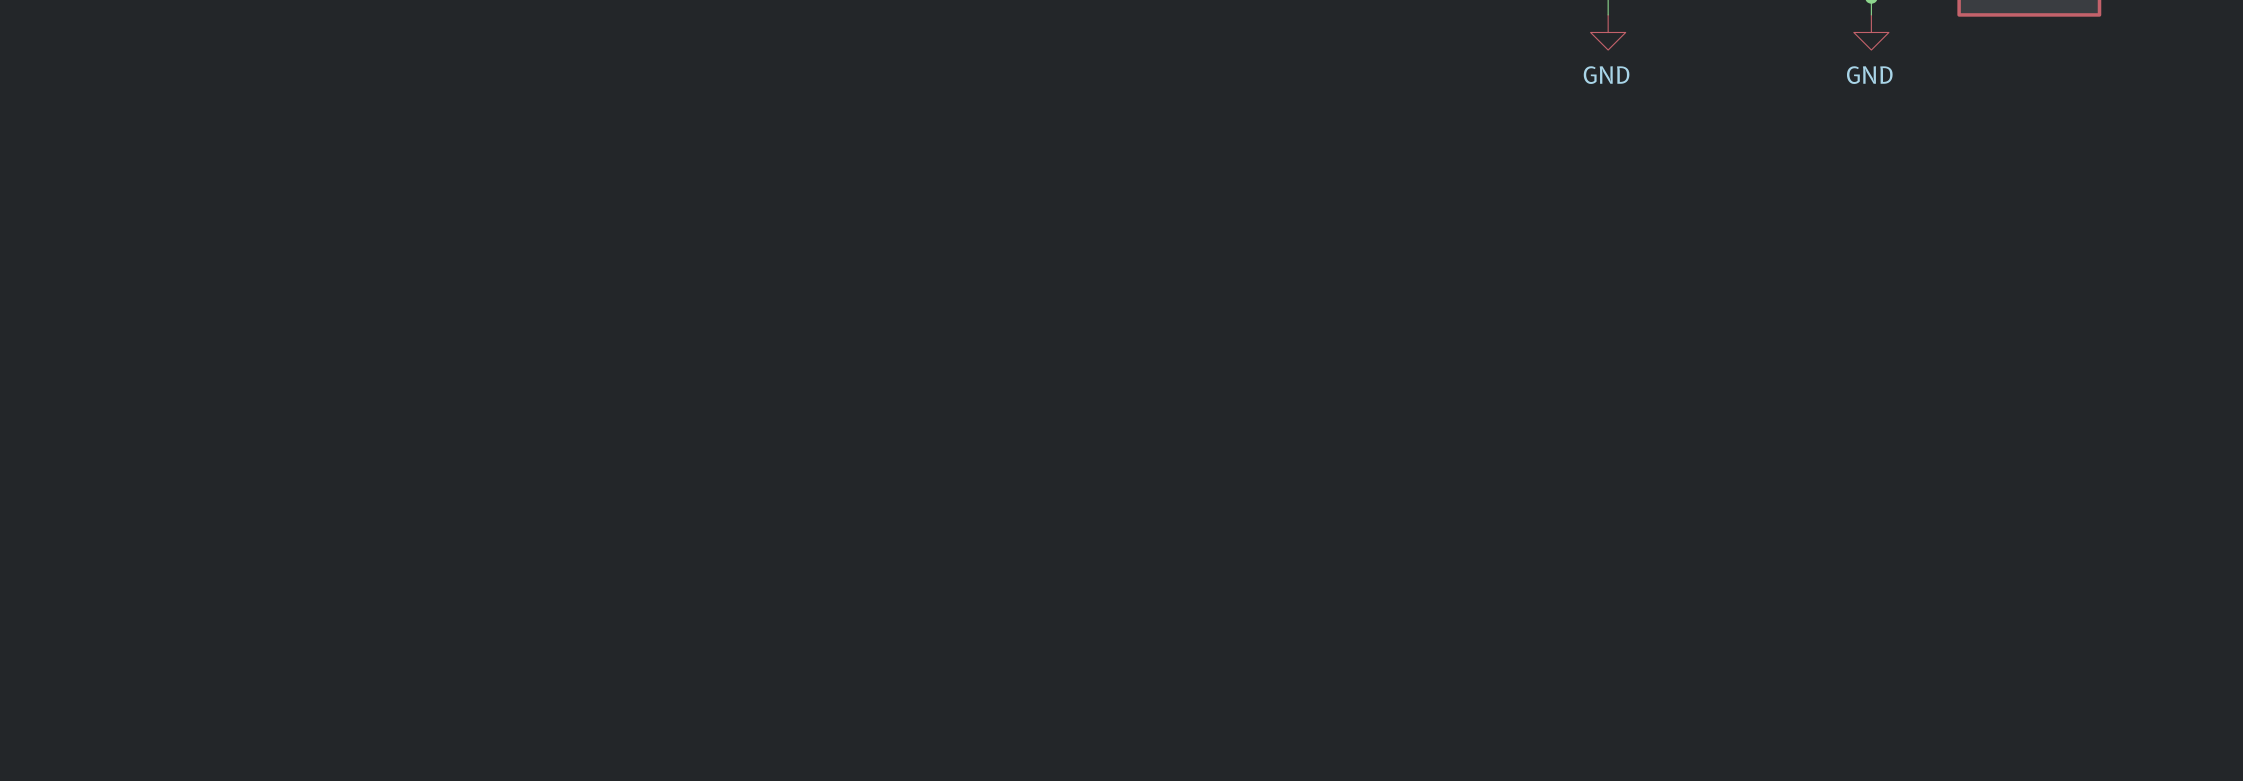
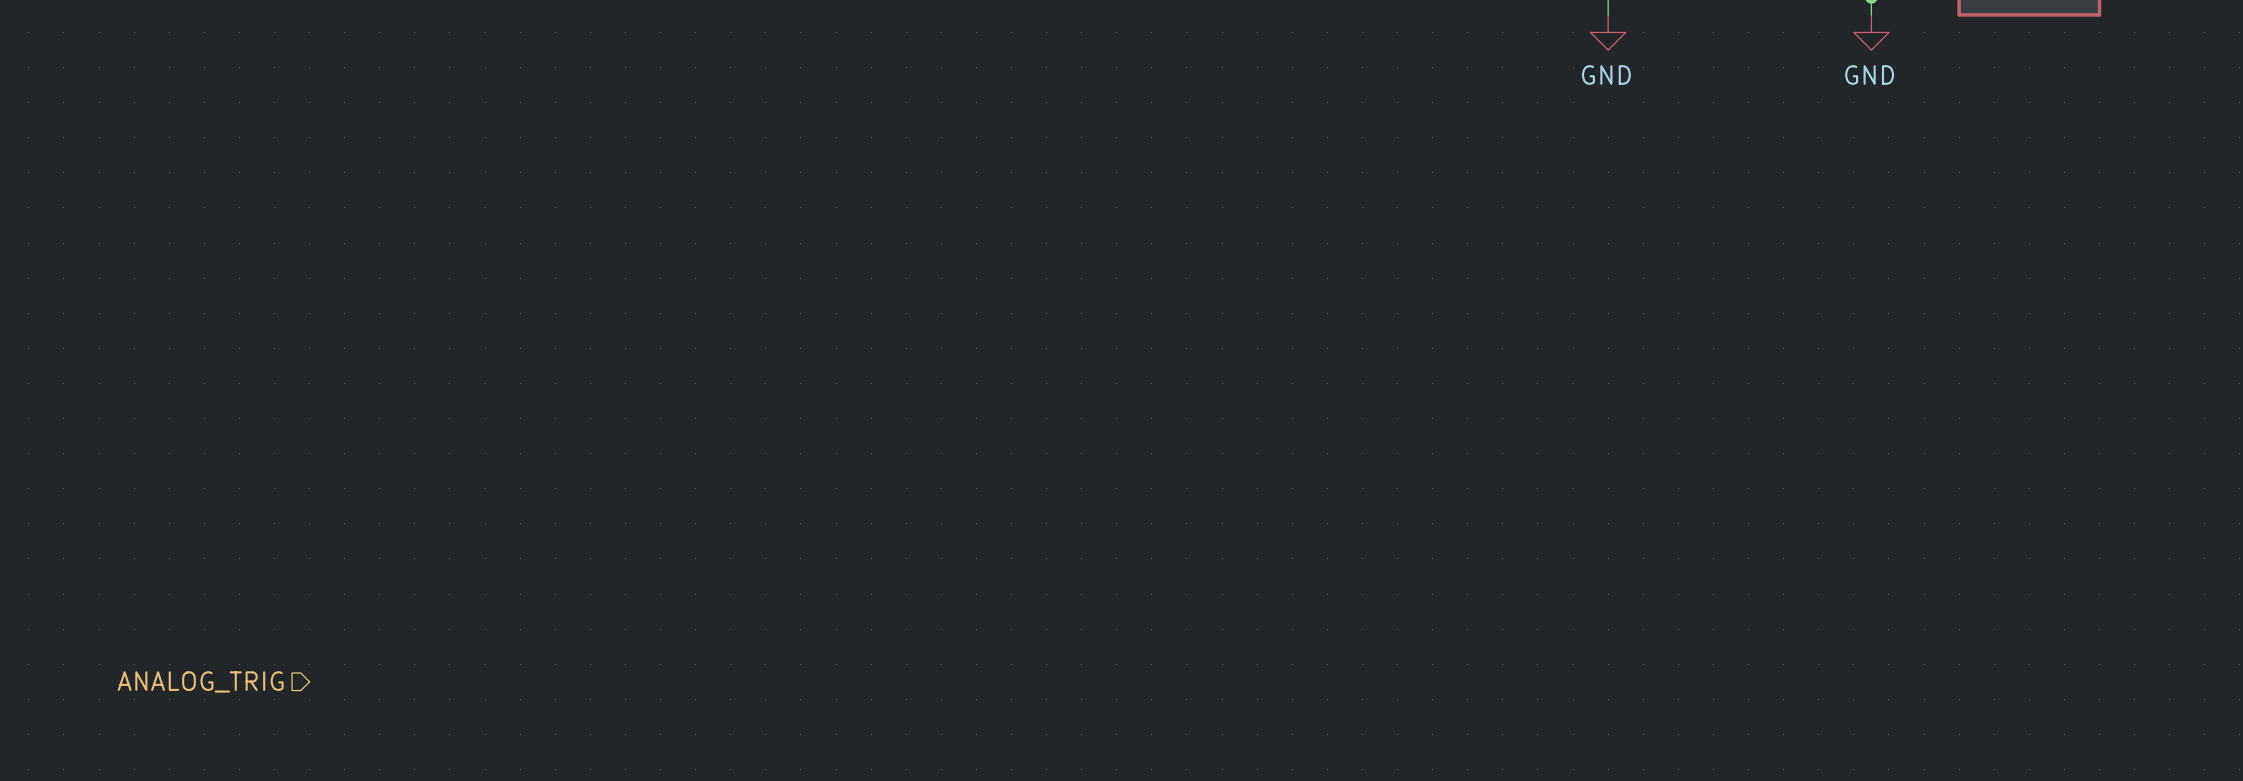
hierarchical label: none -> ANALOG_TRIG (200, 681)

